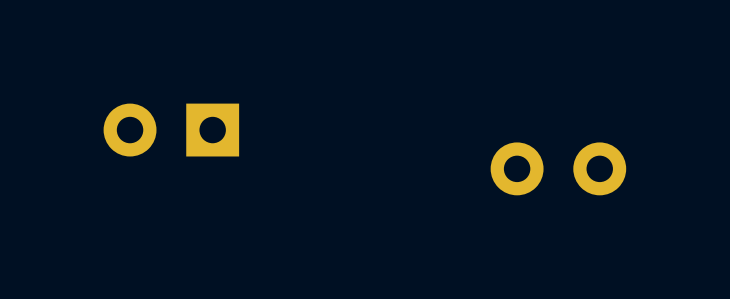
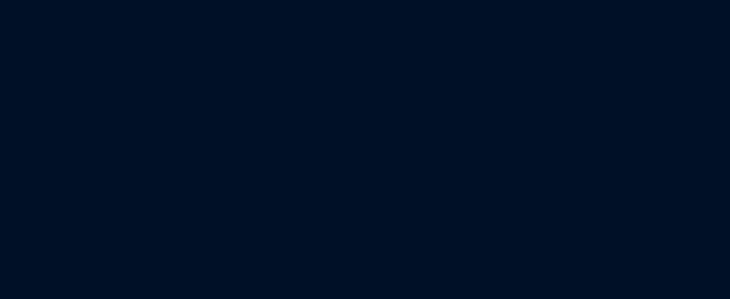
part: (171, 130) -> none
part: (558, 168) -> none

